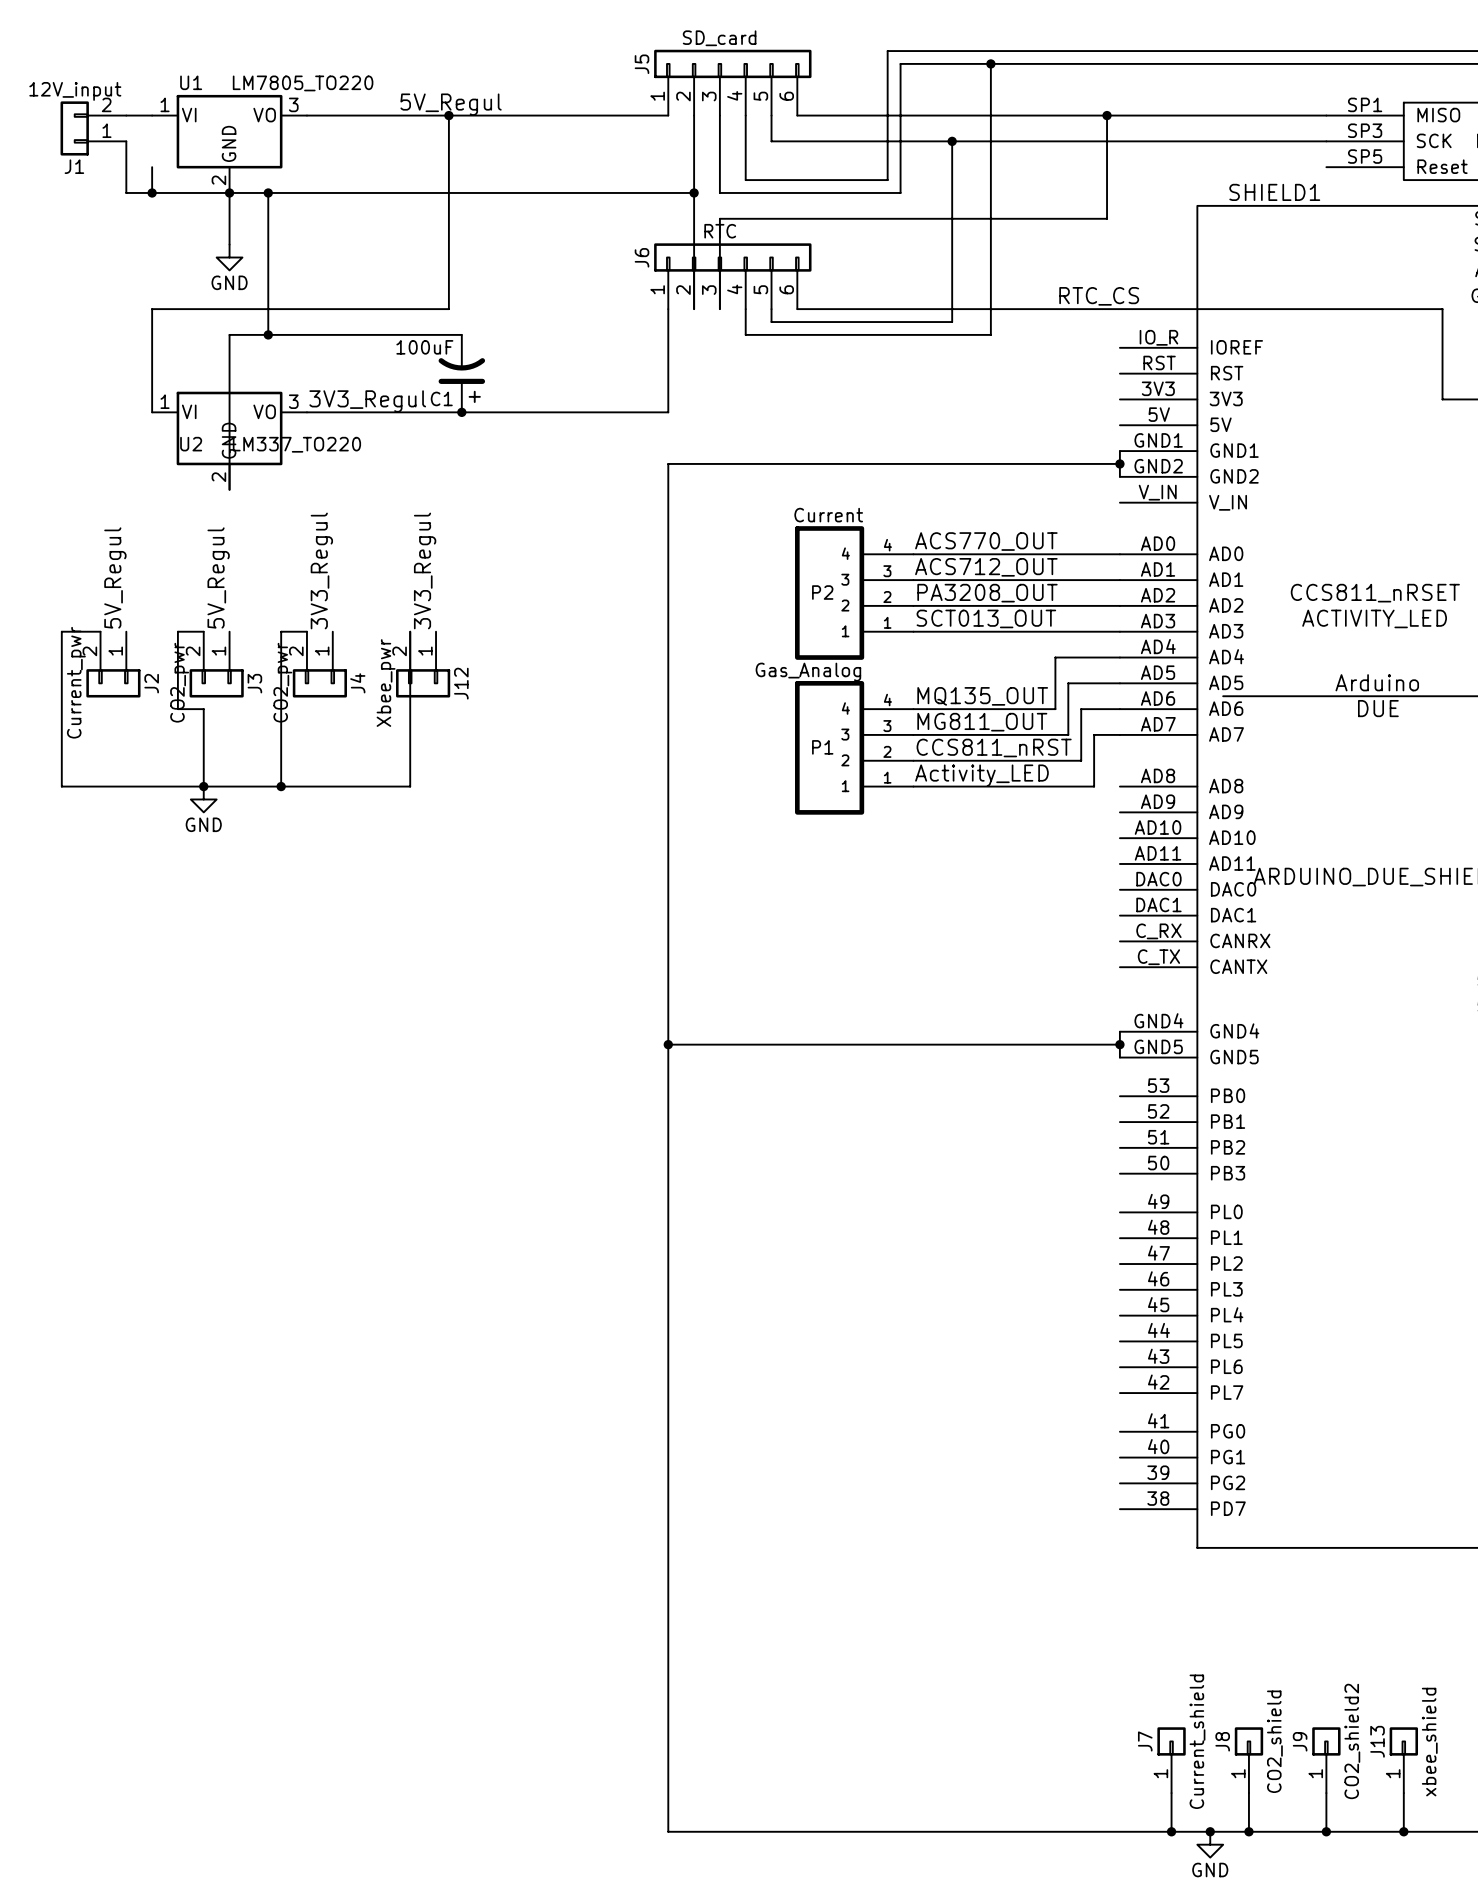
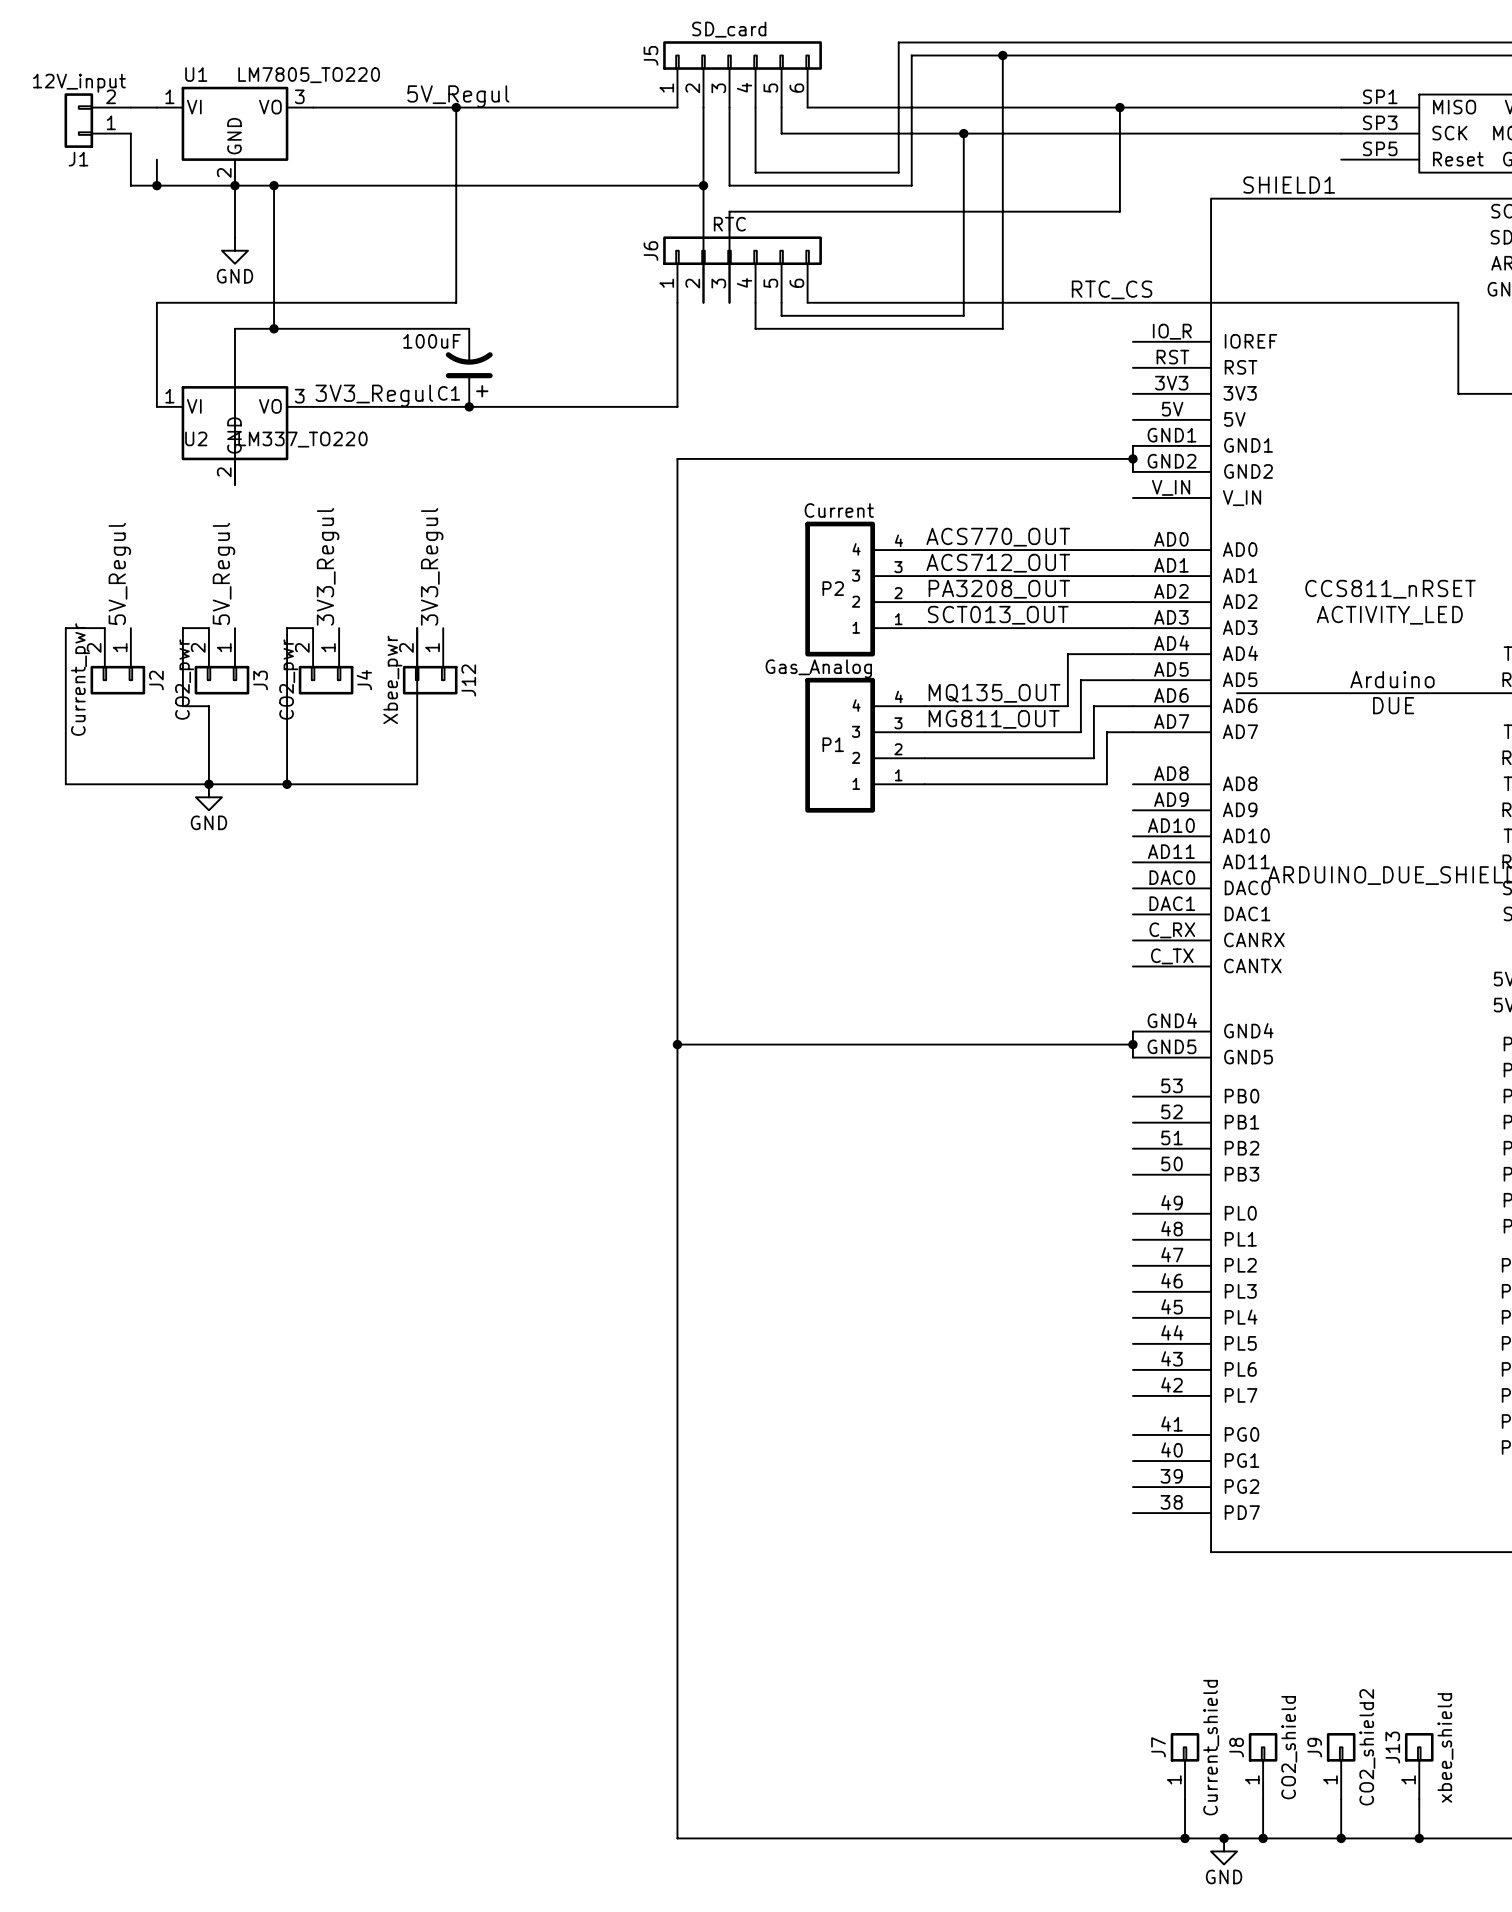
label: CCS811_nRST (994, 747) -> none
label: Activity_LED (981, 775) -> none

